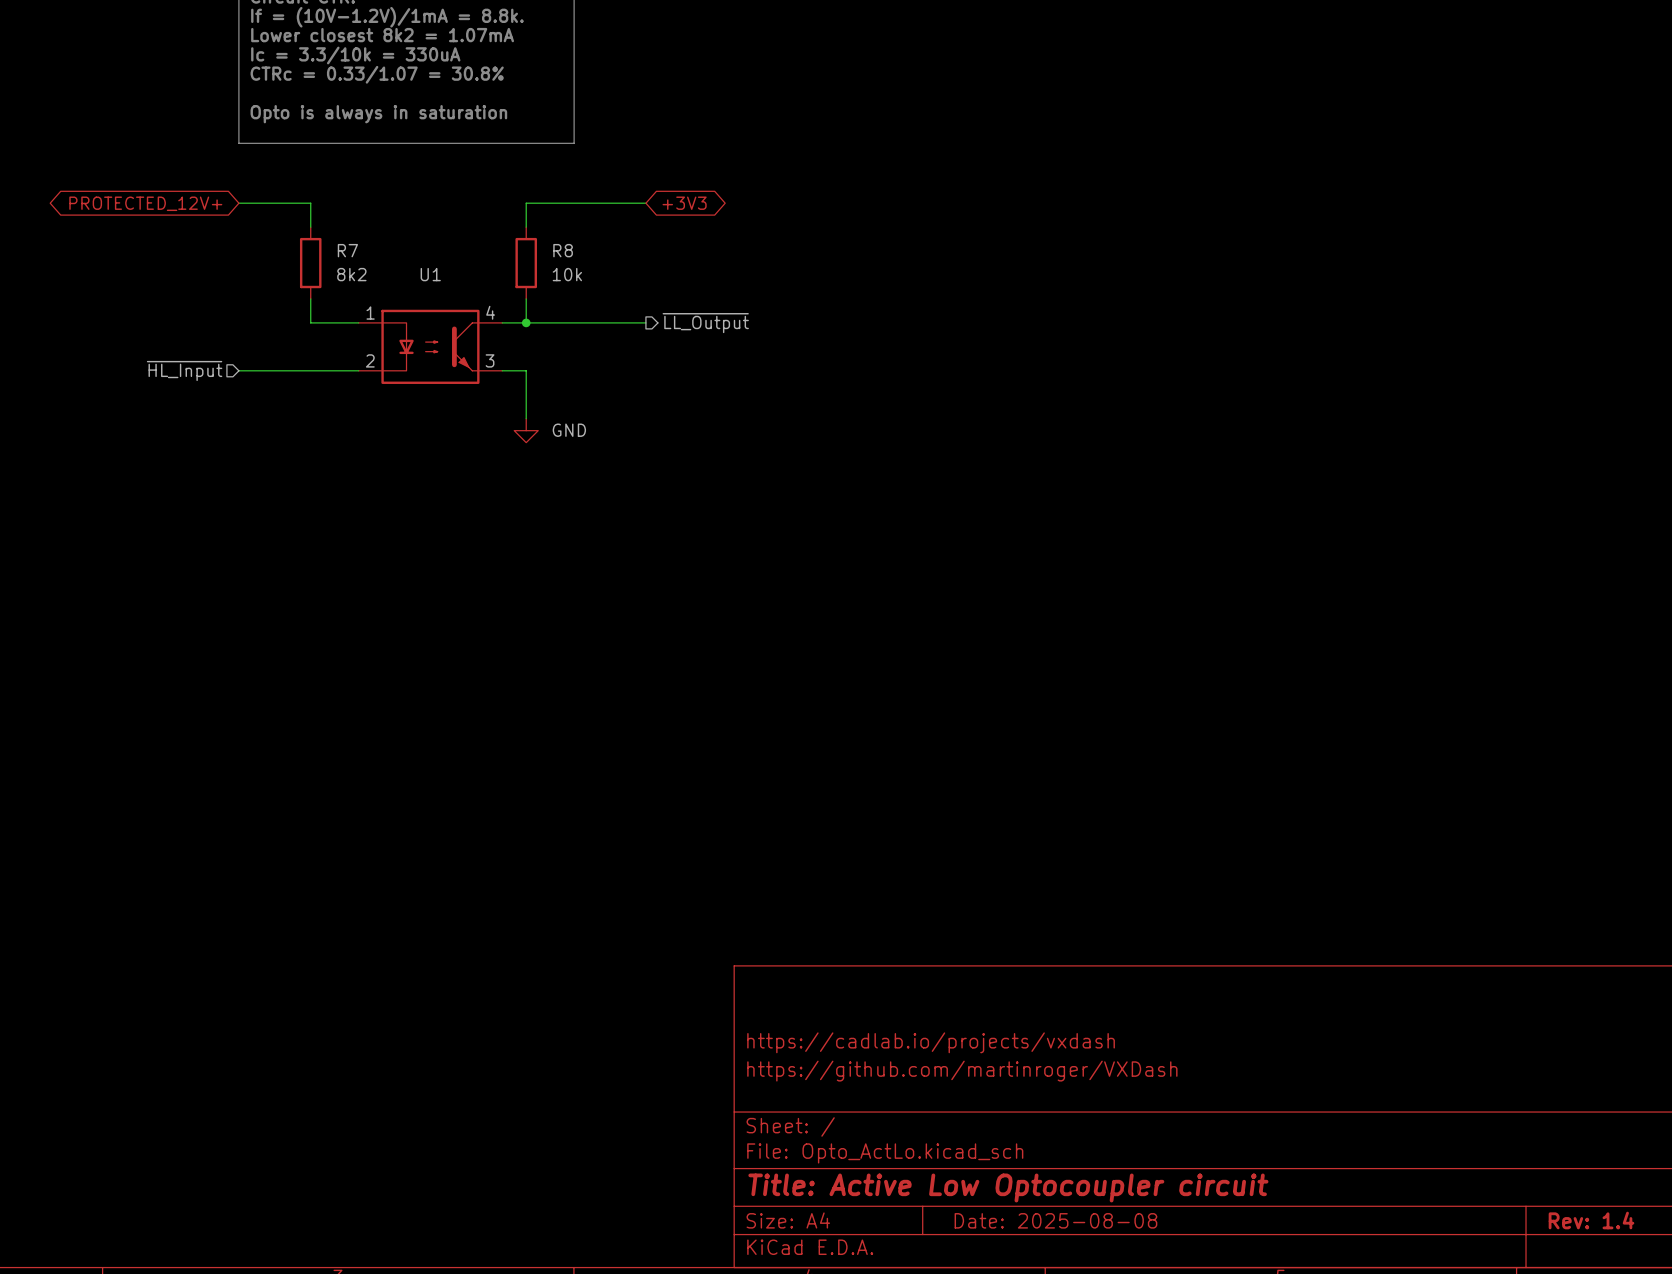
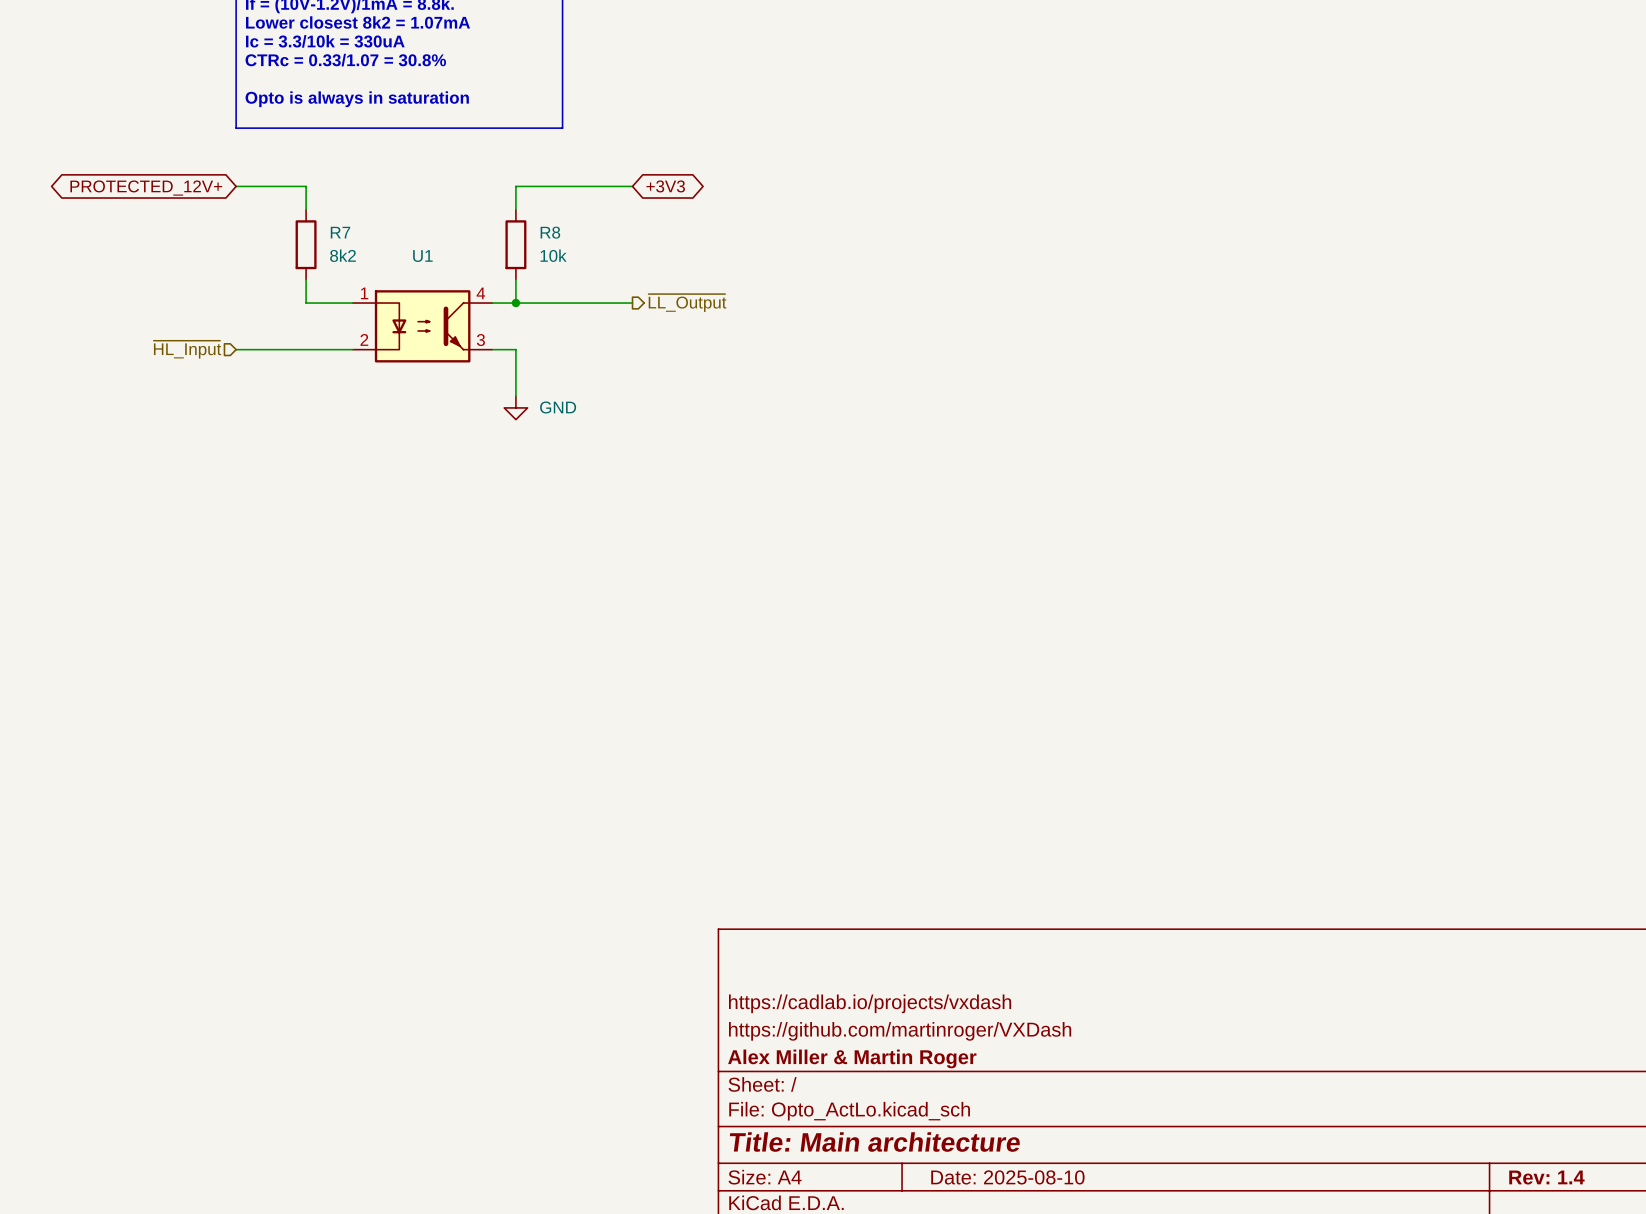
title block: none -> Alex Miller & Martin Roger (852, 1058)
title block: Title: Active Low Optocoupler circuit (1008, 1187) -> Title: Main architecture (874, 1142)
title block: Date: 2025-08-08 (1055, 1220) -> Date: 2025-08-10 (1007, 1177)

